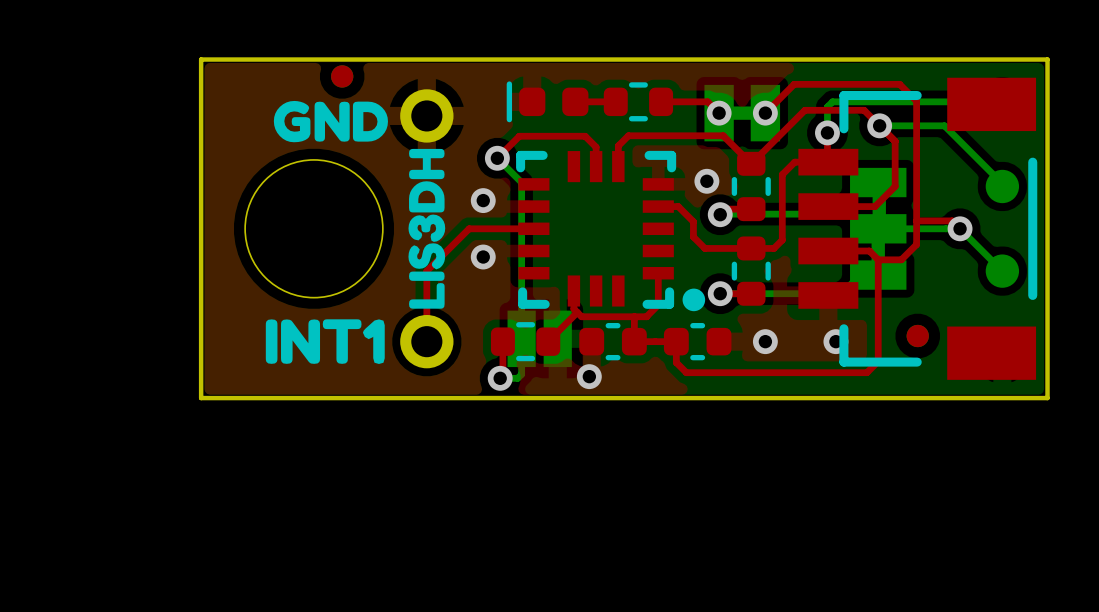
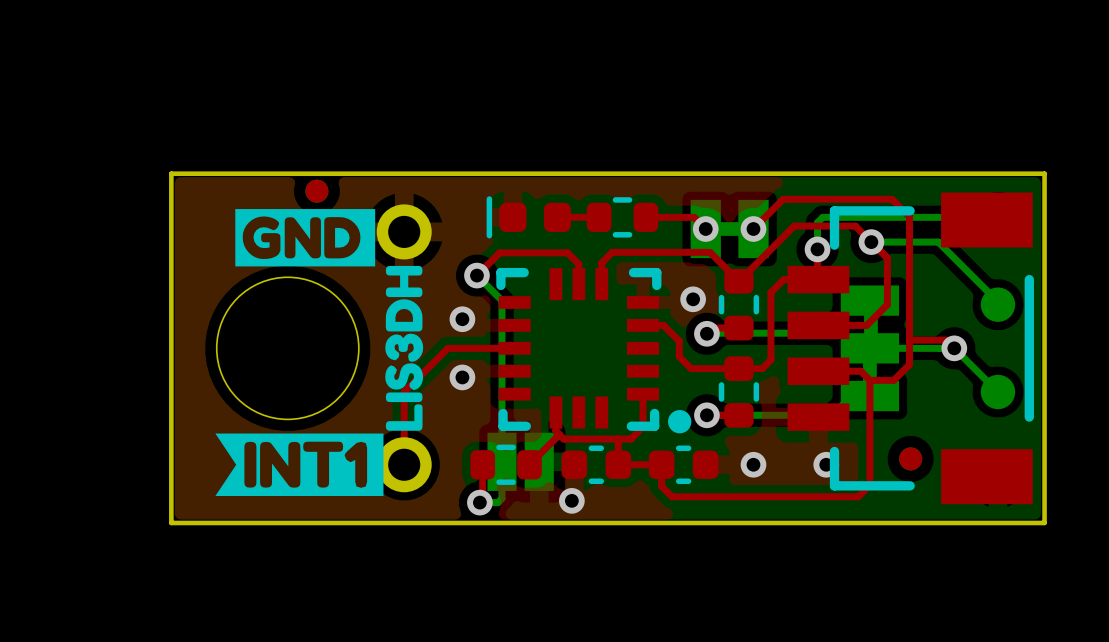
drawing shape: [273, 100, 388, 143] -> [235, 209, 376, 267]
drawing shape: [265, 319, 385, 364] -> [215, 433, 384, 497]

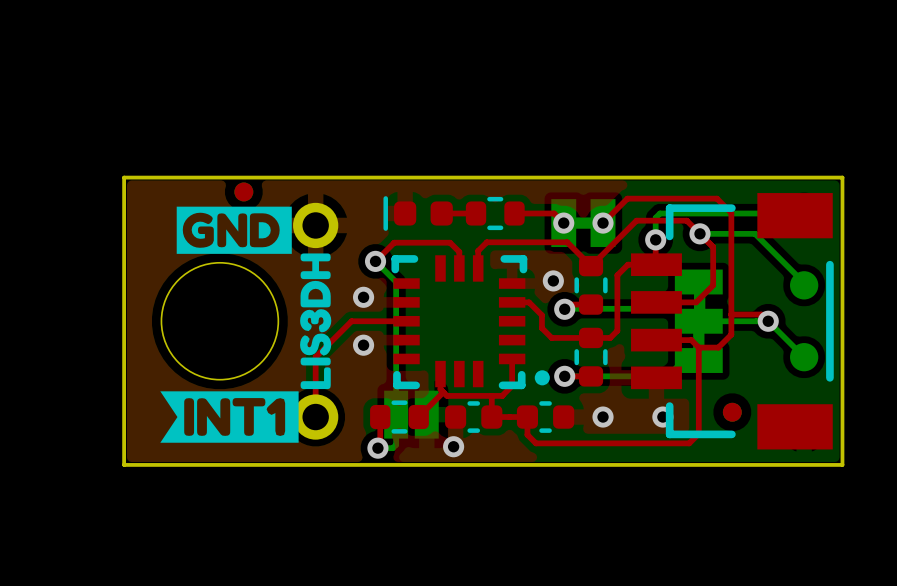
part footprint: [496, 267, 692, 434] -> [391, 255, 550, 390]

